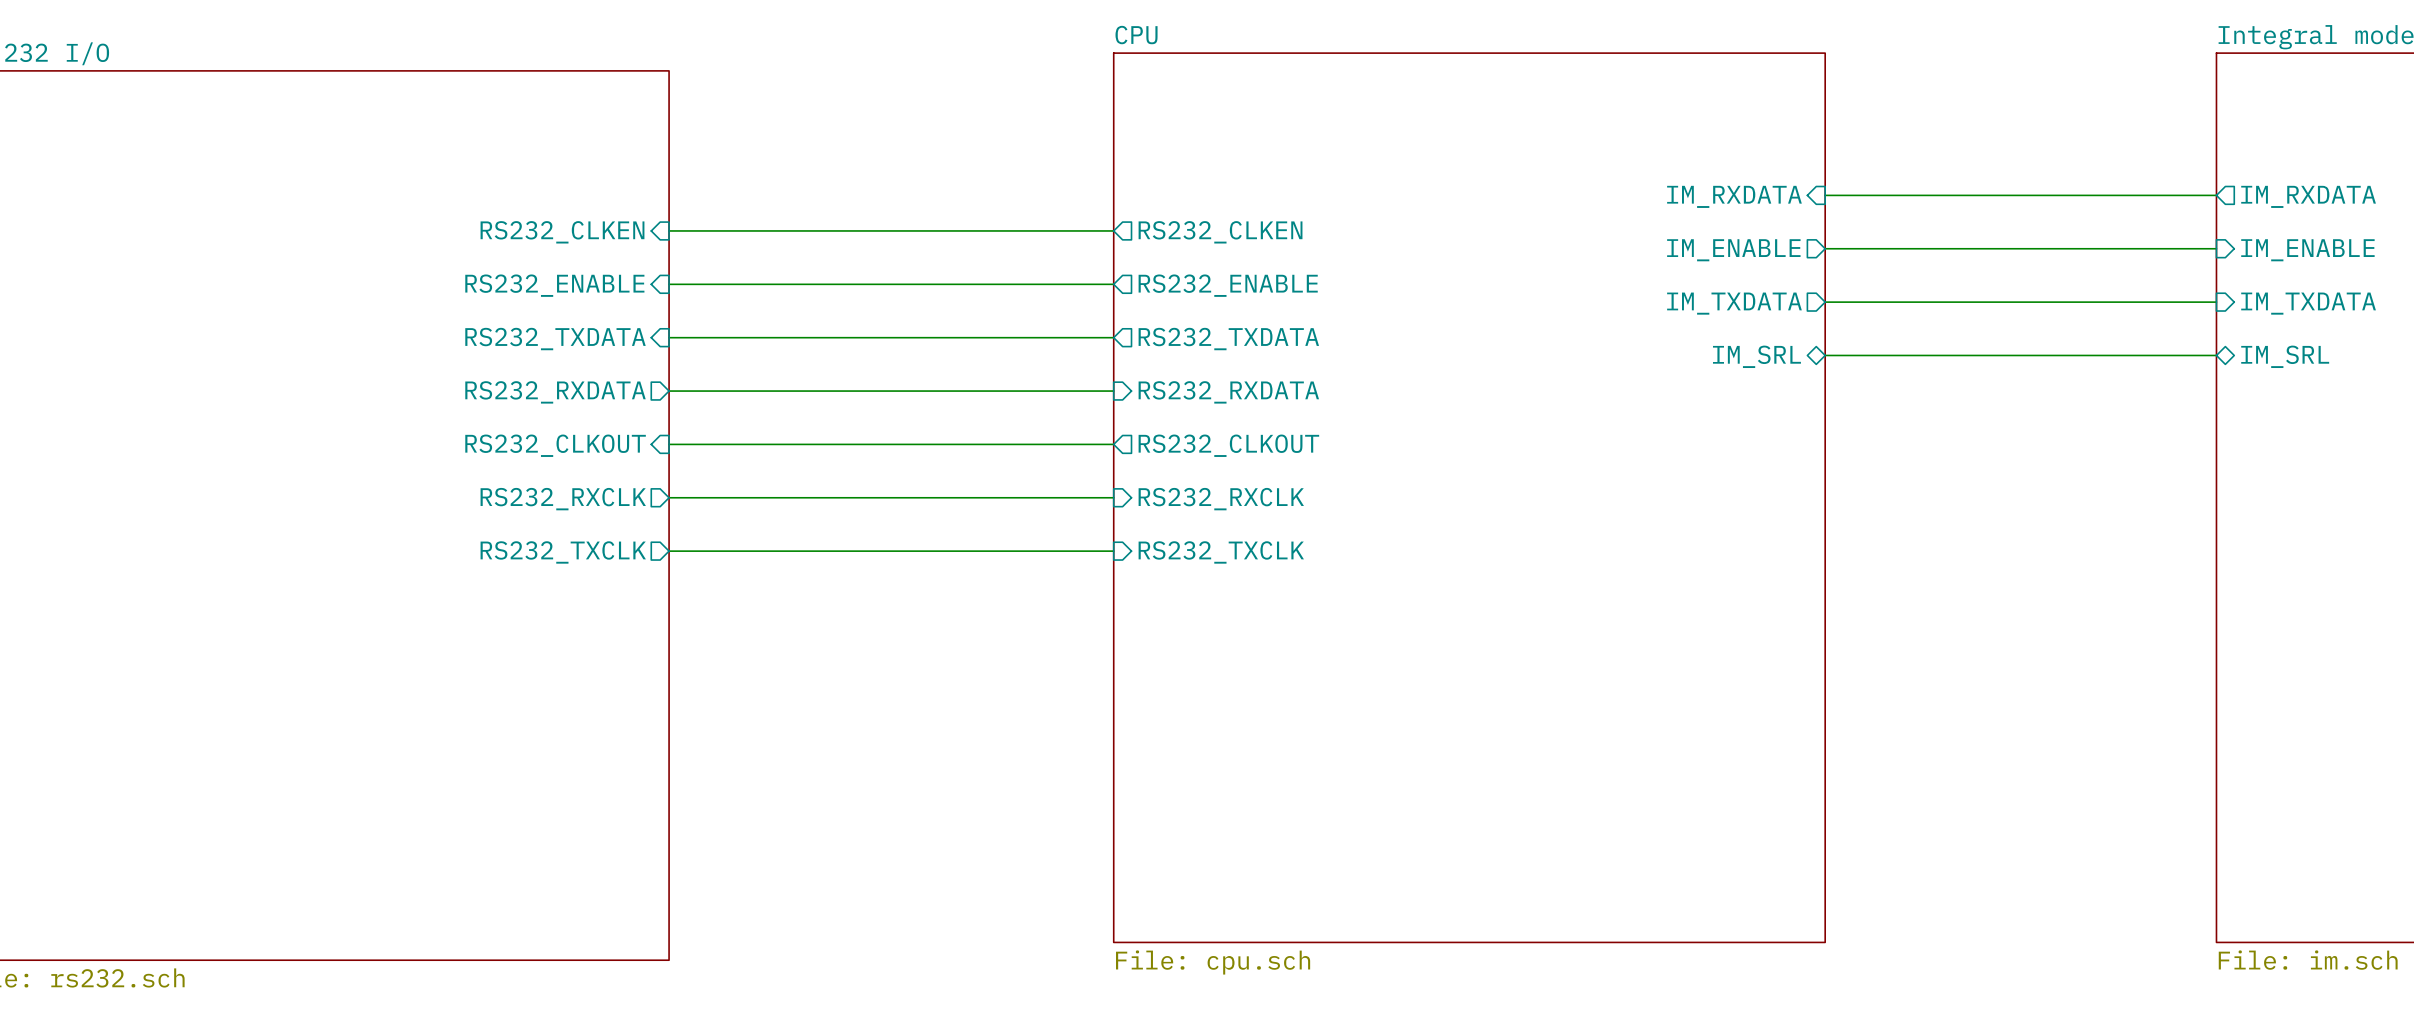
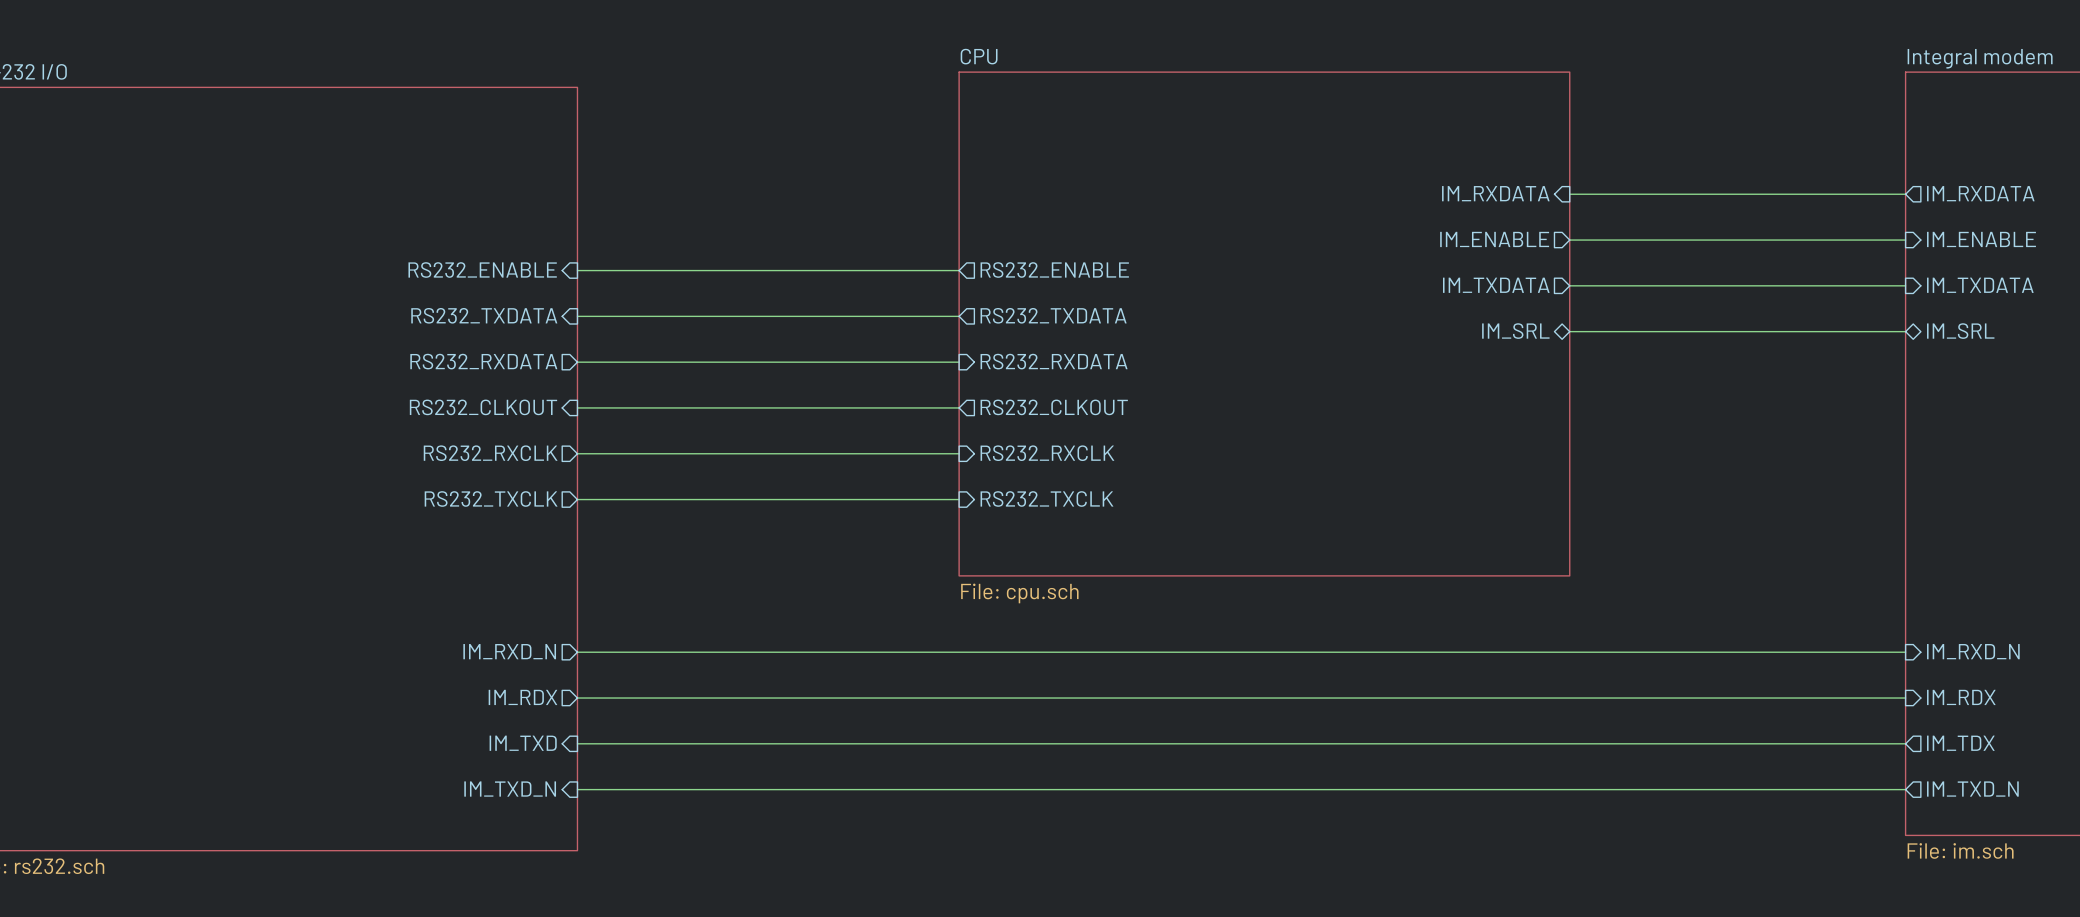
wire: (669, 230) (1113, 230) -> none
sheet pin: RS232_CLKEN (562, 232) -> none
sheet pin: RS232_CLKEN (1220, 232) -> none
sheet CPU: none -> File: cpu.sch (1264, 324)
sheet CPU: File: cpu.sch (1469, 497) -> none
wire: none -> (577, 652) (1905, 652)
sheet pin: none -> IM_RXD_N (509, 651)
sheet pin: none -> IM_RXD_N (1973, 651)
wire: none -> (577, 698) (1905, 698)
sheet pin: none -> IM_RDX (522, 697)
sheet pin: none -> IM_RDX (1961, 697)
wire: none -> (577, 743) (1905, 743)
sheet pin: none -> IM_TXD (523, 743)
sheet pin: none -> IM_TDX (1960, 743)
wire: none -> (577, 789) (1905, 789)
sheet pin: none -> IM_TXD_N (510, 789)
sheet pin: none -> IM_TXD_N (1972, 789)

